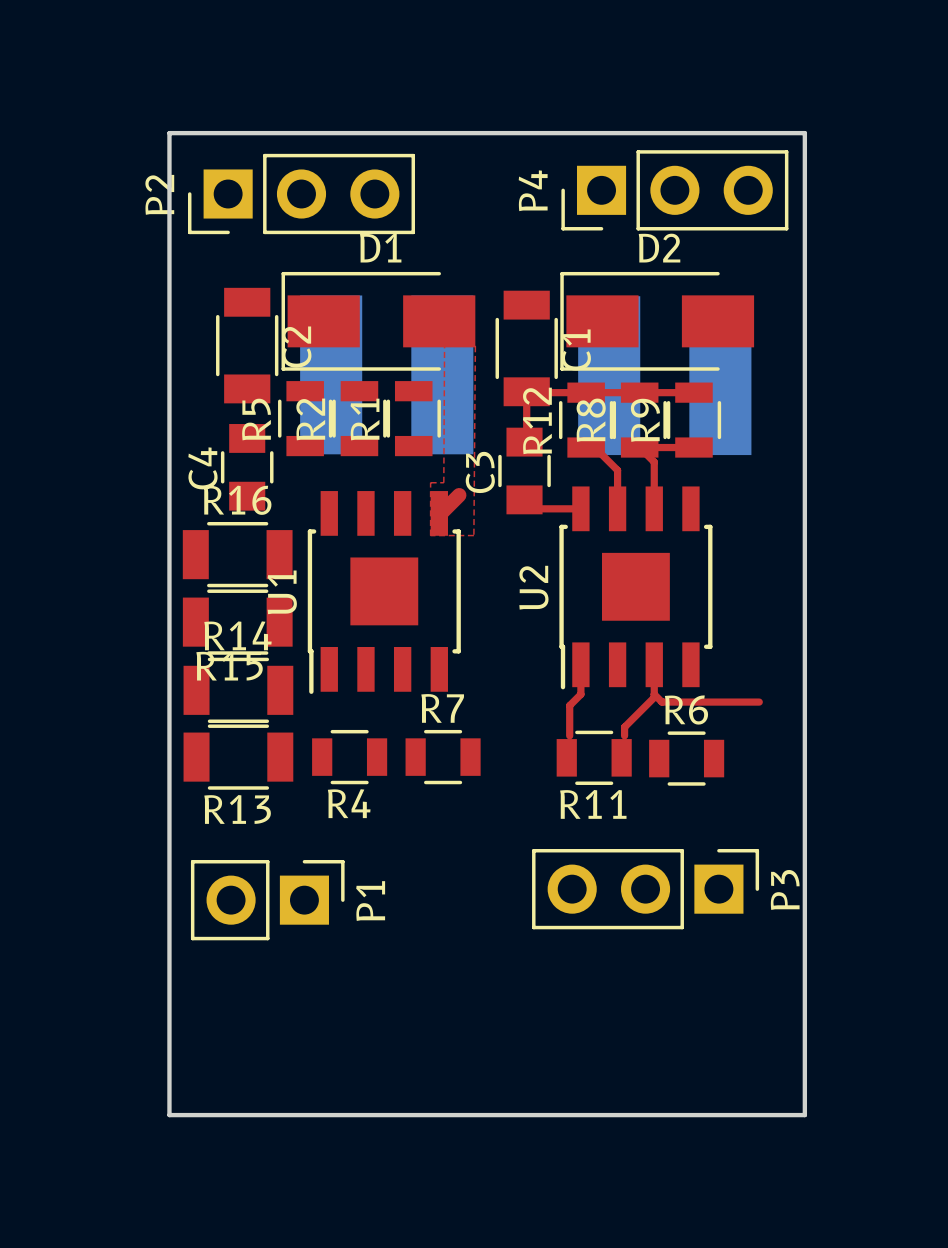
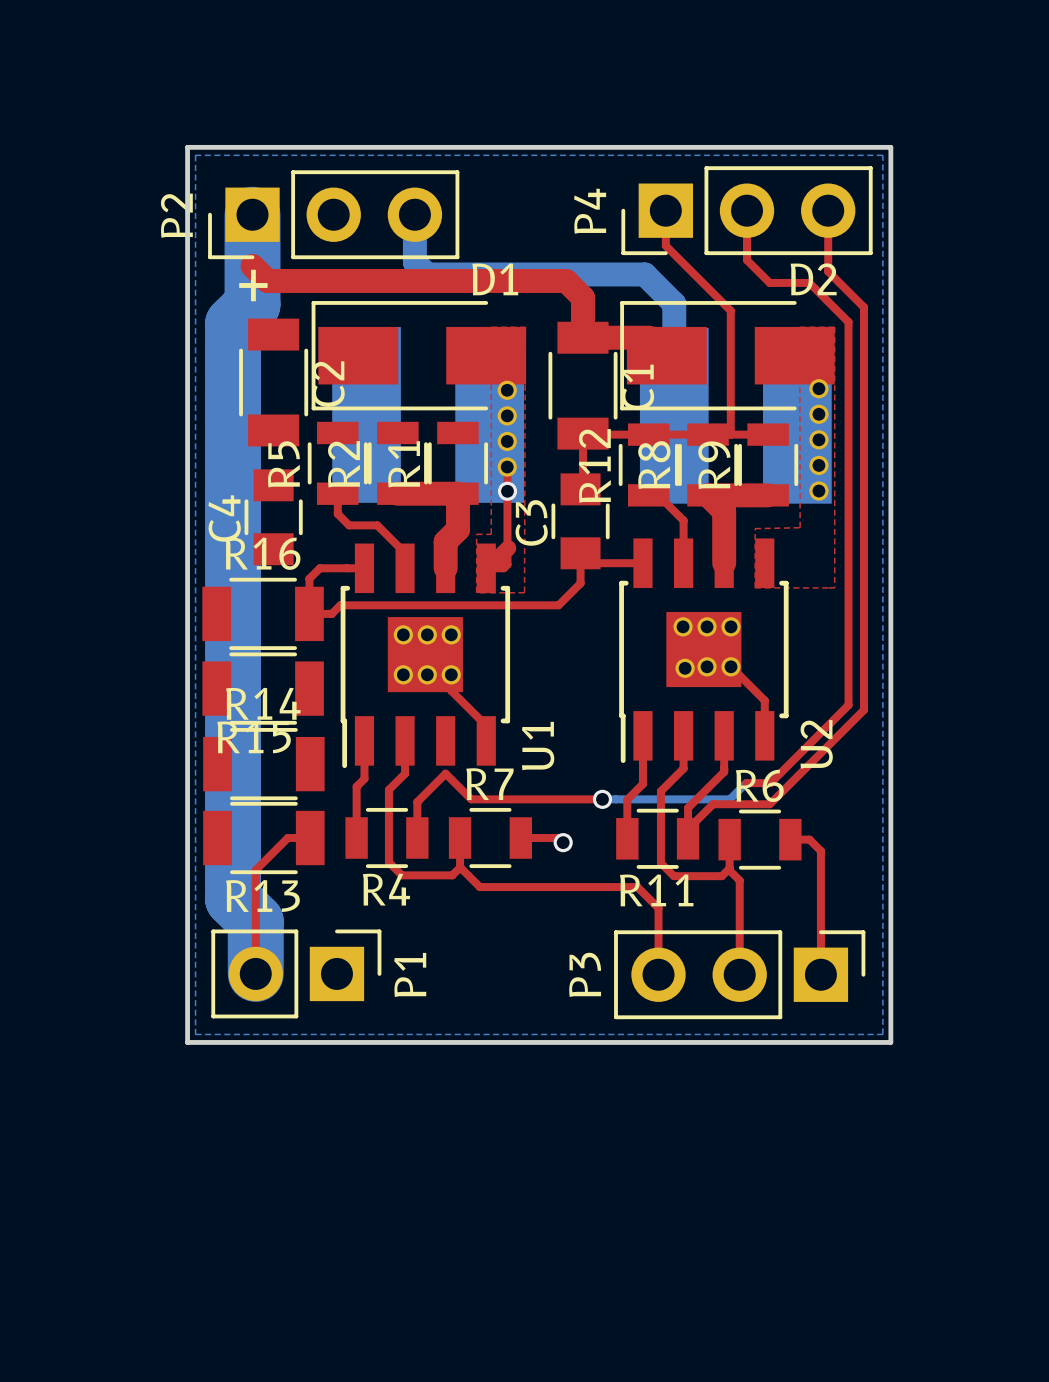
bottom zone outline: none -> (195, 155) (195, 1034) (882, 1034) (882, 155) (195, 155)
top track: none -> (665, 210) (665, 245) (730, 310) (730, 434)
top track: none -> (747, 210) (747, 260) (769, 282) (809, 282) (848, 322) (848, 705) (770, 783) (746, 783)
top track: none -> (828, 210) (828, 271) (863, 307) (863, 710) (769, 804) (713, 804) (688, 829)
bottom track: none -> (252, 214) (252, 304) (233, 324) (233, 898) (255, 921) (255, 973)
bottom track: none -> (414, 214) (414, 262) (427, 274) (644, 274) (674, 303) (674, 415)
top track: none -> (252, 265) (267, 280) (566, 280) (583, 297) (583, 337) (648, 337) (666, 355)
D1 name position: D1 (380, 248) -> D1 (495, 279)
D2 name position: D2 (659, 248) -> D2 (813, 279)
text: none -> + (253, 285)
top zone outline: none -> (799, 327) (834, 327) (834, 587) (755, 587) (755, 528) (800, 527) (799, 327)
part: none -> (818, 388)
part: none -> (507, 390)
part: none -> (818, 414)
part: none -> (507, 415)
part: none -> (818, 439)
part: none -> (507, 441)
part: none -> (818, 465)
part: none -> (507, 467)
top track: none -> (507, 477) (507, 564) (503, 568) (486, 568)
via: none -> (507, 491)
part: none -> (818, 491)
top track: none -> (337, 493) (337, 514) (349, 525) (377, 525) (405, 553) (405, 568)
top track: none -> (397, 493) (457, 493) (457, 529) (445, 541) (445, 568)
top track width: thin (693, 447) (639, 447) (654, 462) (654, 508) -> thick (768, 495) (708, 495) (724, 511) (724, 563)
top zone outline: (443, 482) (444, 346) (475, 346) (473, 535) -> (491, 534) (491, 327) (525, 327) (524, 592)
top track: none -> (580, 553) (580, 583) (558, 605) (340, 605) (331, 613) (309, 613) (309, 578) (319, 568) (364, 568)
part: none -> (683, 626)
part: none -> (707, 626)
part: none -> (731, 626)
part: none -> (403, 634)
part: none -> (427, 634)
part: none -> (451, 634)
U2 name position: U2 (533, 587) -> U2 (816, 744)
U1 name position: U1 (282, 592) -> U1 (538, 746)
part: none -> (707, 666)
top track: none -> (731, 666) (764, 700) (764, 735)
part: none -> (731, 666)
part: none -> (685, 668)
part: none -> (403, 674)
part: none -> (427, 674)
top track: none -> (451, 674) (451, 690) (486, 725) (486, 740)
part: none -> (451, 674)
top track: none -> (683, 735) (683, 768) (660, 791) (660, 863) (673, 876) (721, 876) (729, 868)
top track: none -> (364, 740) (364, 778) (356, 786) (356, 838)
top track: none -> (405, 740) (405, 773) (388, 789) (388, 862) (401, 875) (452, 875) (460, 867) (460, 838)
top track: (580, 694) (569, 705) (569, 735) -> (642, 768) (642, 784) (627, 799) (627, 838)
top track: (654, 694) (661, 702) (759, 702) -> none
top track: (654, 697) (624, 727) (624, 735) -> (724, 771) (688, 807) (688, 838)
bottom track: none -> (746, 783) (729, 799) (602, 799)
top track: none -> (602, 799) (471, 799) (445, 773) (417, 802) (417, 838)
via: none -> (602, 799)
top track: none -> (310, 838) (287, 838) (255, 870) (255, 973)
top track: none -> (520, 838) (558, 838) (563, 842)
top track: none -> (729, 839) (729, 870) (739, 880) (739, 974)
top track: none -> (790, 839) (809, 839) (820, 850) (820, 974)
via: none -> (563, 842)
top track: none -> (460, 867) (479, 887) (637, 887) (658, 908) (658, 974)
P3 position: (645, 889) -> (739, 974)
P3 name position: P3 (785, 889) -> P3 (585, 974)
P1 position: (267, 900) -> (296, 973)
board edge: (169, 941) (169, 1115) (804, 1115) (804, 941) -> (187, 1042) (890, 1042)

